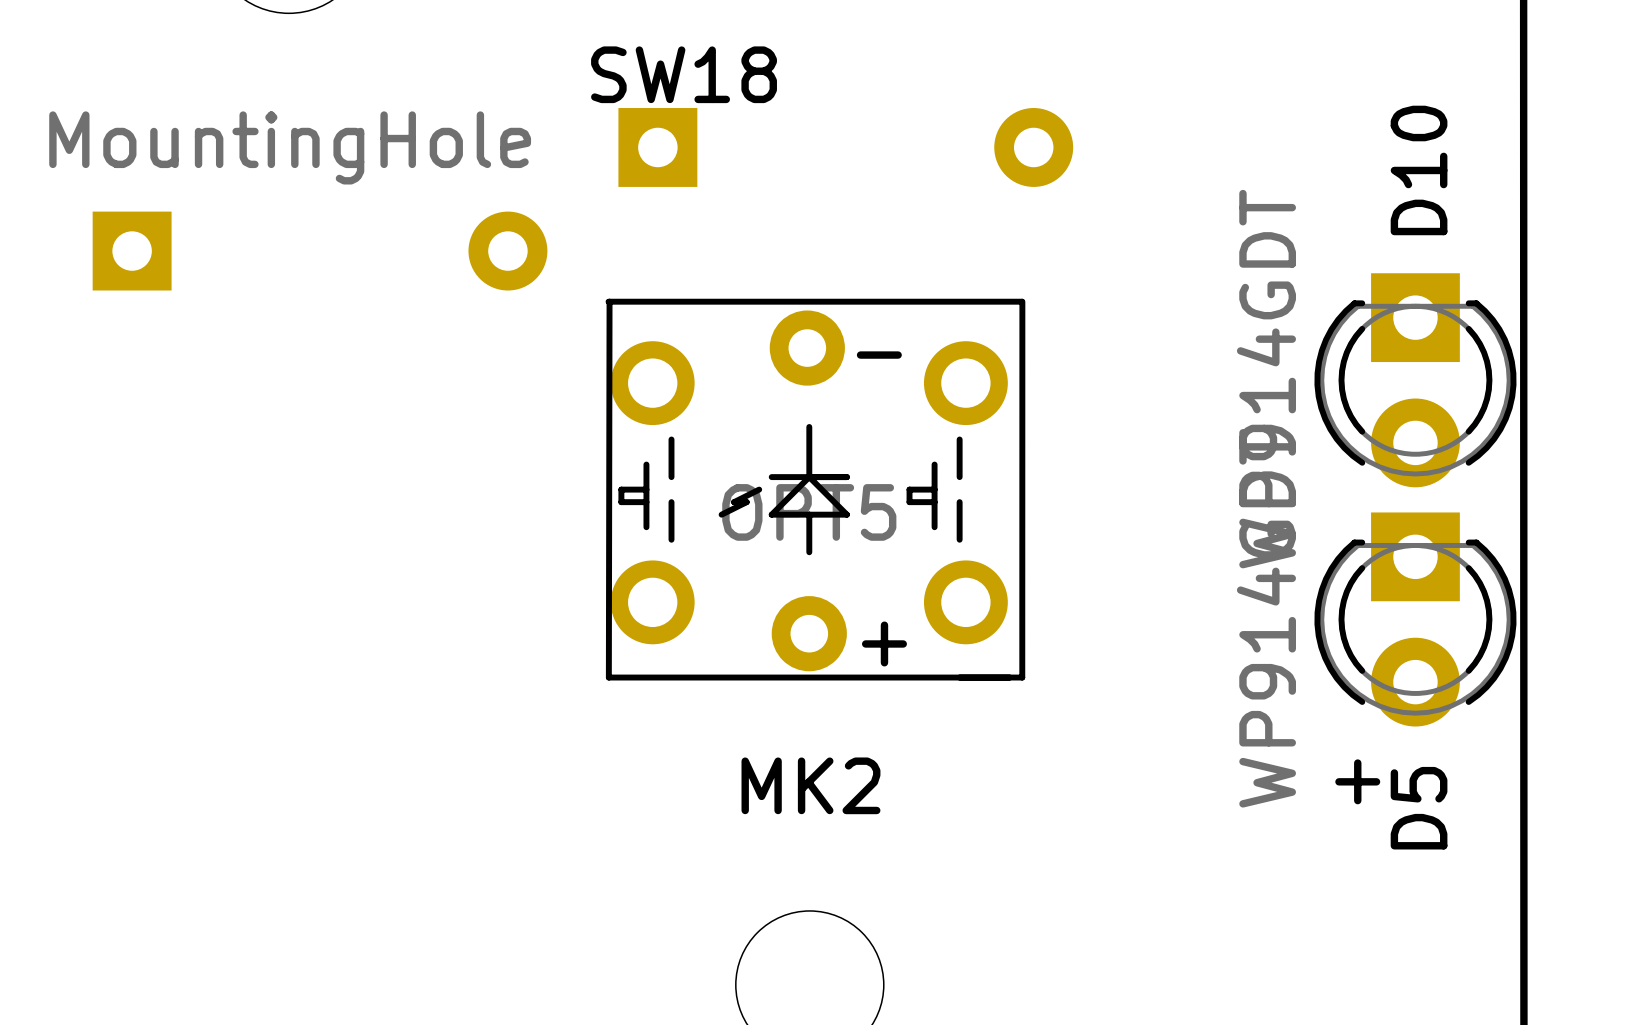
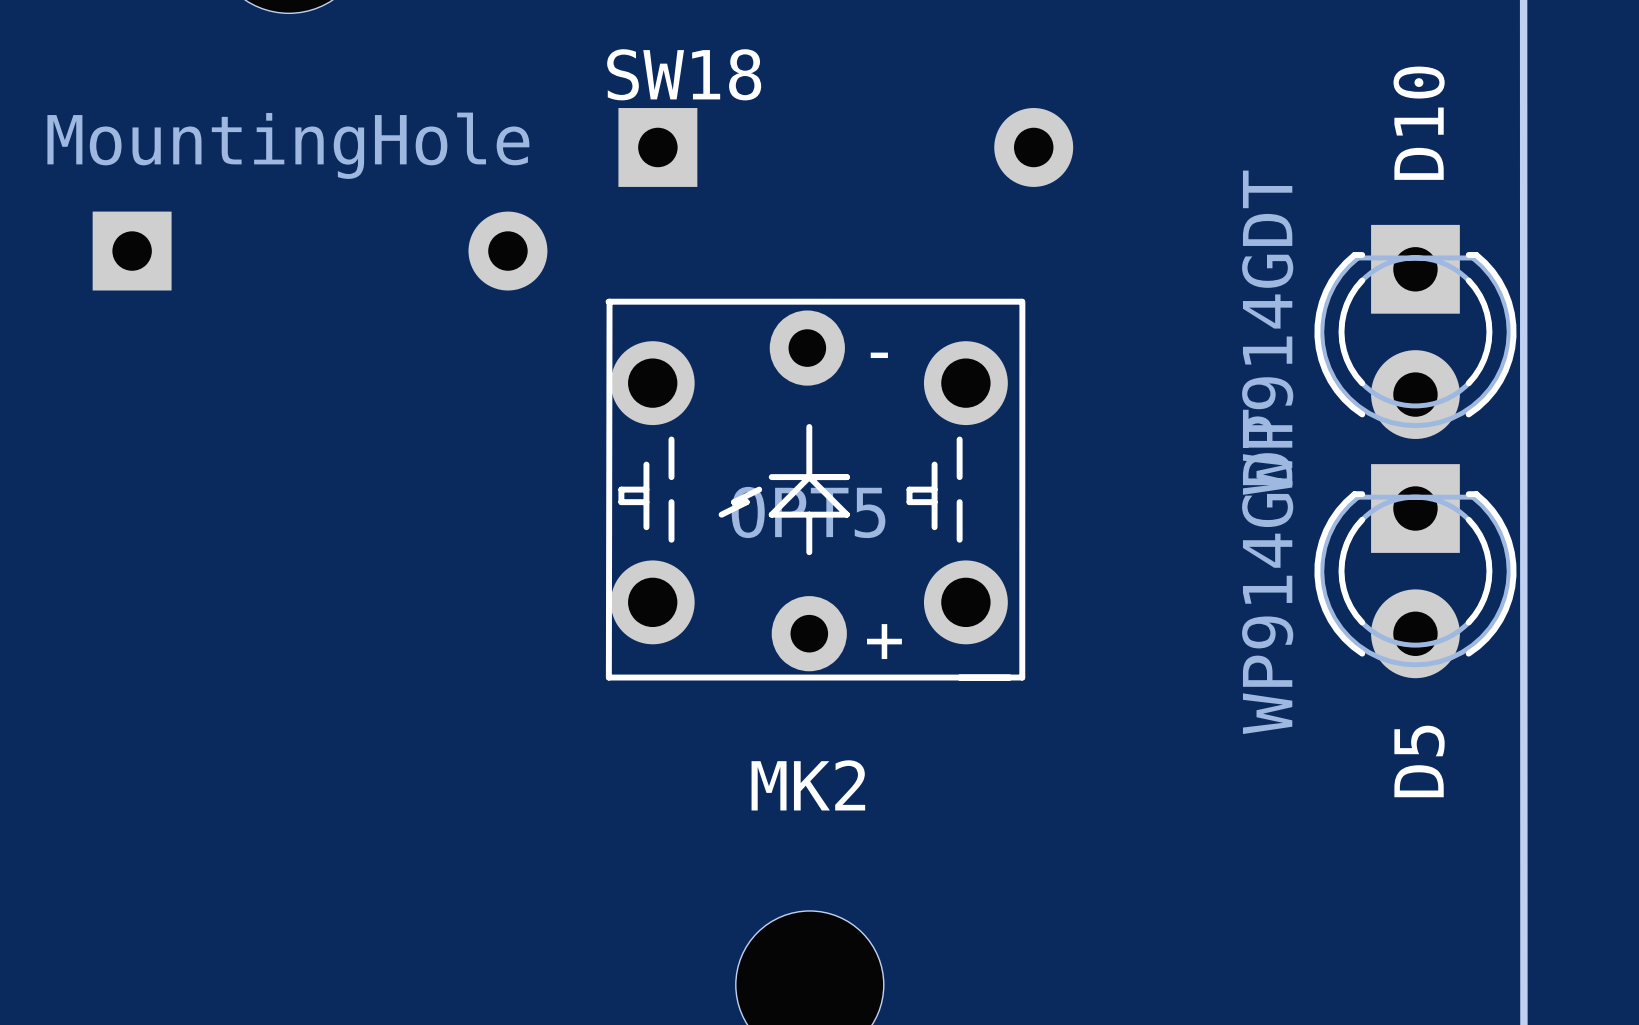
D10 position: (1415, 380) -> (1415, 331)
D5 position: (1415, 619) -> (1415, 571)
text: + (1357, 781) -> none

